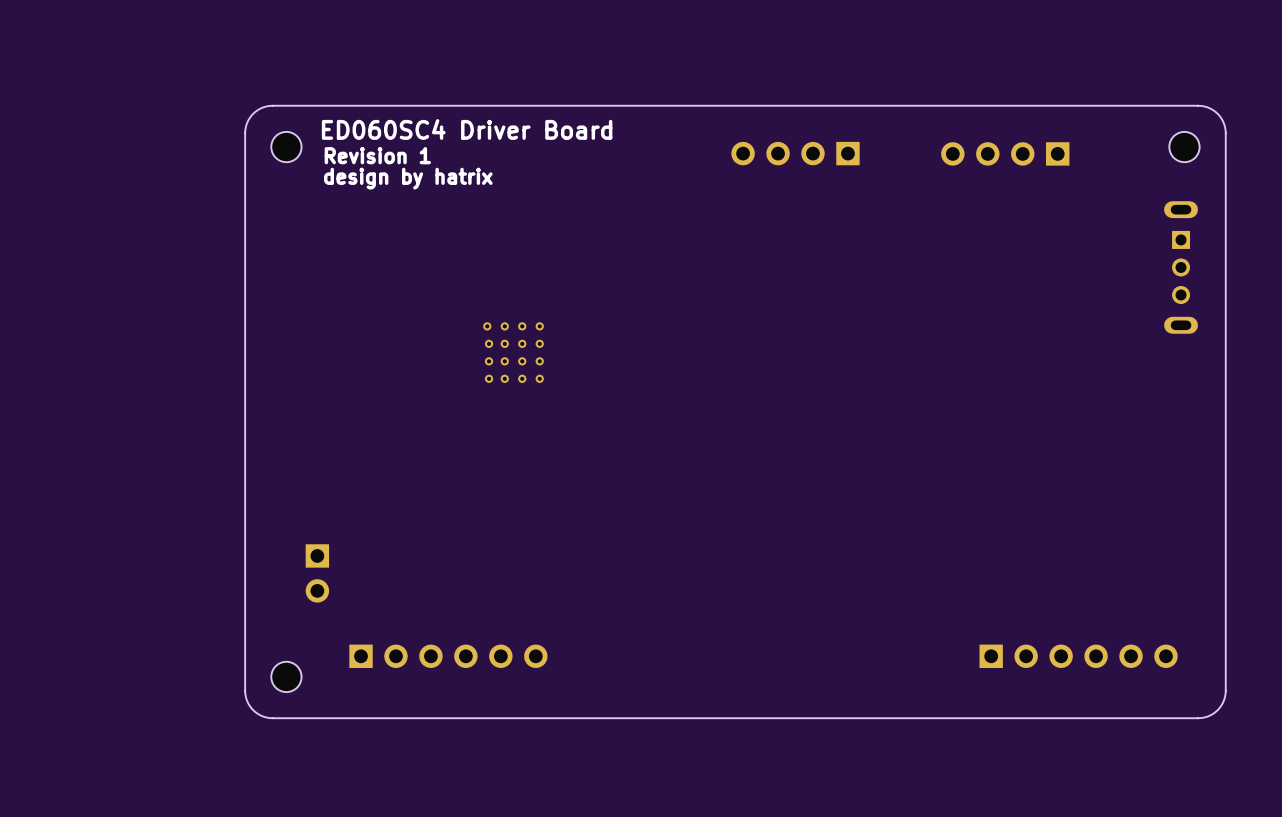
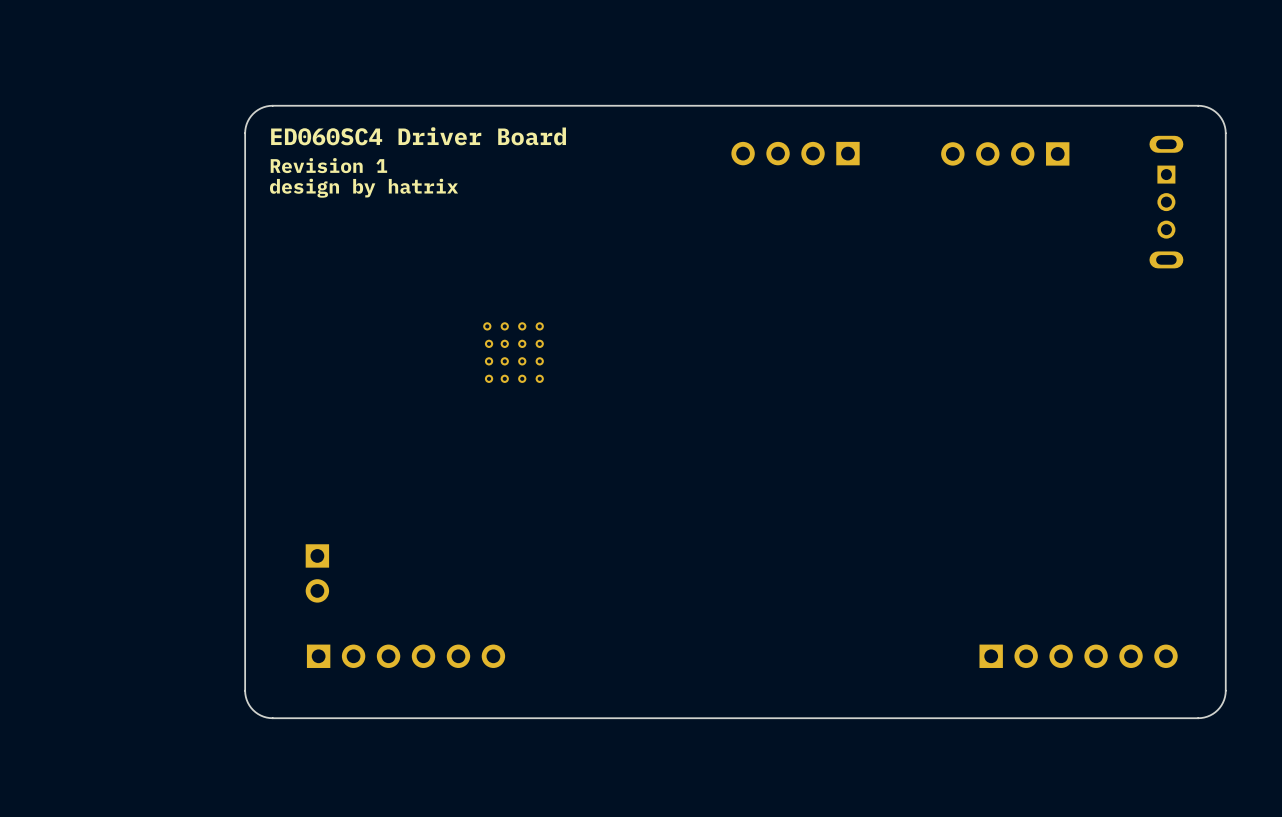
text position: ED060SC4 Driver Board (467, 129) -> ED060SC4 Driver Board (418, 136)
part: (286, 147) -> none
part: (1184, 147) -> none
text position: Revision 1 (377, 155) -> Revision 1 (328, 165)
text position: design by hatrix (408, 178) -> design by hatrix (364, 188)
part position: (1181, 267) -> (1166, 202)
part position: (448, 656) -> (406, 656)
part: (286, 676) -> none

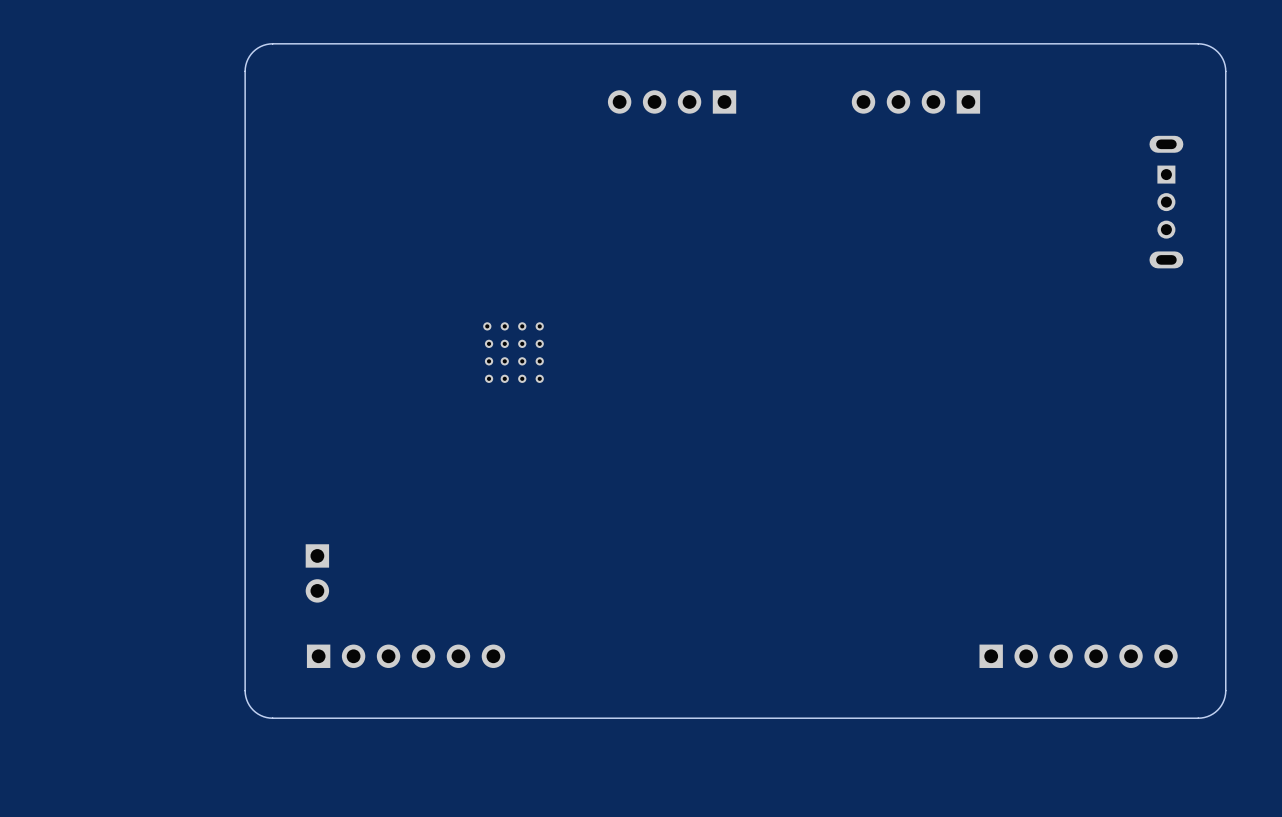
part: none -> (672, 101)
part: none -> (915, 101)
board edge: (1225, 133) (1224, 124) (1217, 113) (1210, 108) (1198, 105) (272, 105) (263, 107) (253, 113) (247, 121) (245, 133) -> (1225, 133) (1224, 62) (1219, 54) (1212, 48) (1198, 43) (269, 43) (260, 46) (253, 51) (245, 65) (245, 133)
text: ED060SC4 Driver Board (418, 136) -> none
part: (795, 153) -> none
part: (1005, 153) -> none
text: Revision 1 (328, 165) -> none
text: design by hatrix (364, 188) -> none

